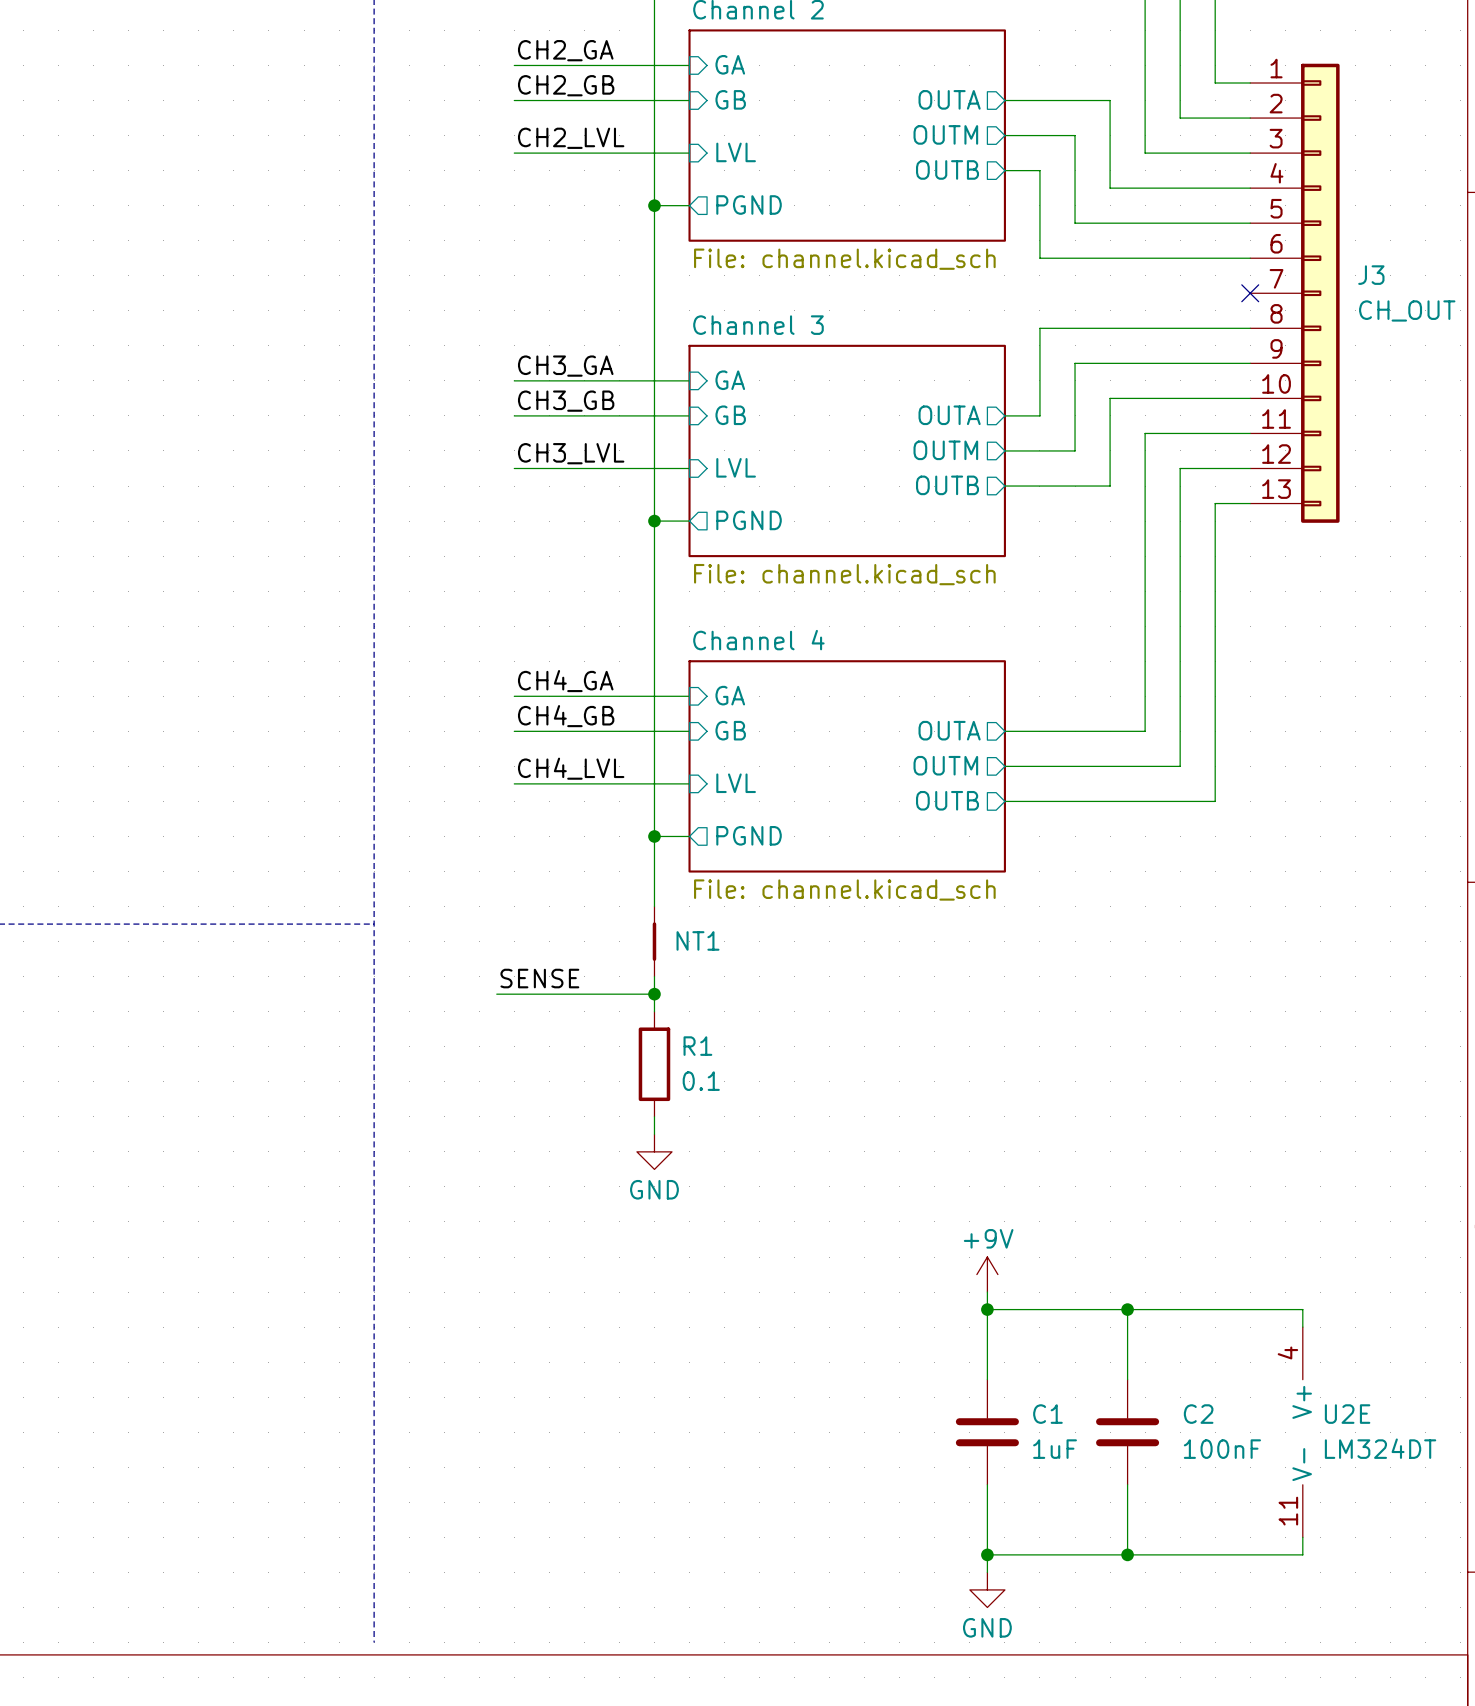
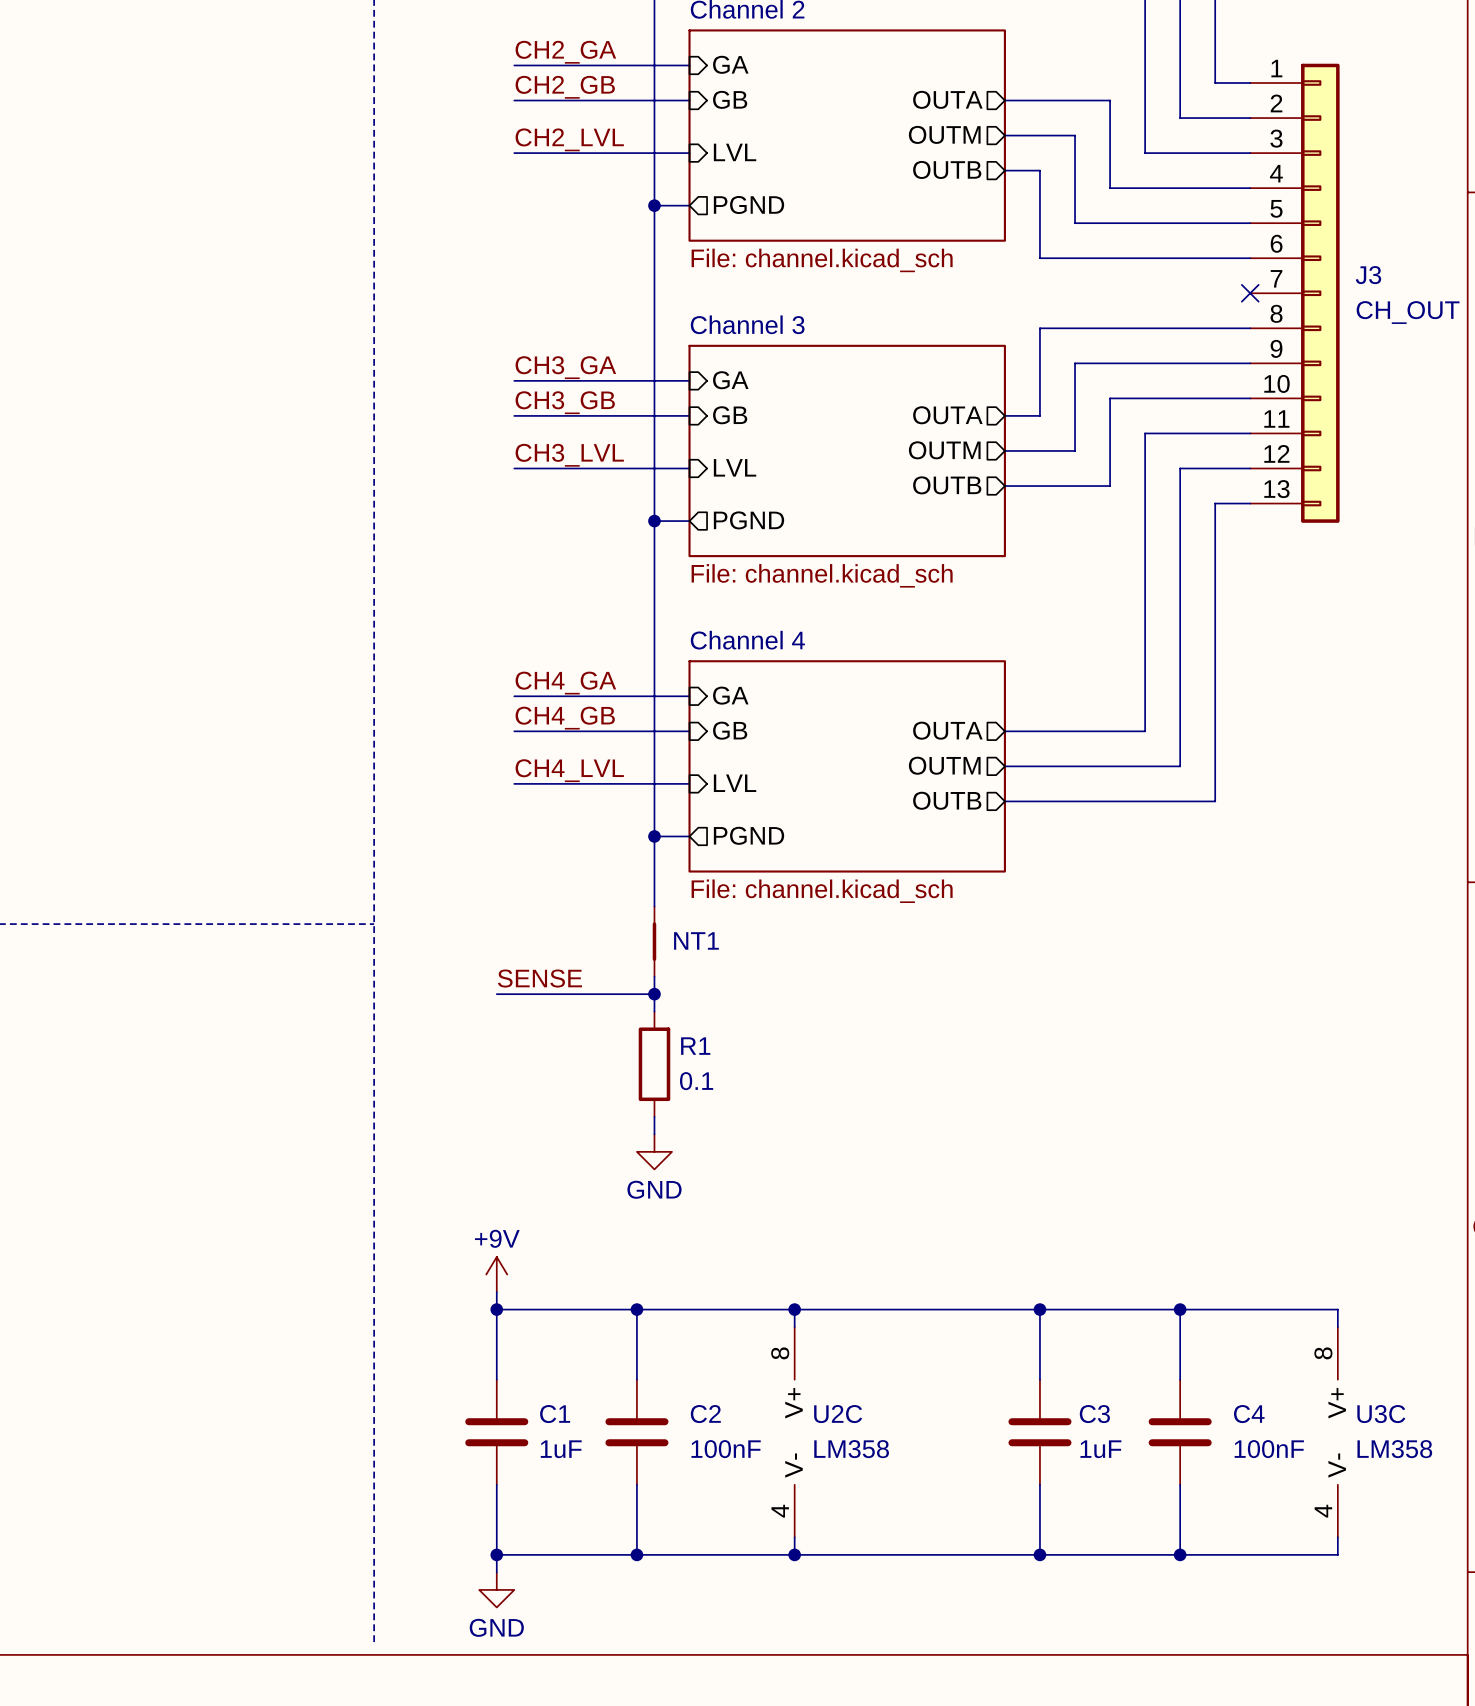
power symbol: none -> +9V (496, 1274)
power symbol: +9V (987, 1274) -> none
wire: none -> (496, 1292) (496, 1379)
wire: (987, 1292) (987, 1379) -> none
wire: none -> (496, 1309) (987, 1309)
junction: none -> (496, 1309)
wire: none -> (636, 1309) (636, 1379)
junction: none -> (636, 1309)
wire: none -> (794, 1309) (794, 1327)
junction: none -> (794, 1309)
junction: (987, 1309) -> none
wire: none -> (1039, 1309) (1039, 1379)
junction: none -> (1039, 1309)
wire: (1127, 1309) (1127, 1379) -> (1180, 1309) (1180, 1379)
junction: (1127, 1309) -> none
junction: none -> (1180, 1309)
wire: (1302, 1309) (1302, 1327) -> (1302, 1309) (1337, 1309) (1337, 1327)
U2C: none -> LM358 (794, 1432)
C1 position: (987, 1432) -> (496, 1432)
C3: none -> 1uF (1039, 1432)
C2 position: (1127, 1432) -> (636, 1432)
C4: none -> 100nF (1180, 1432)
U2E: LM324DT (1302, 1432) -> none
U3C: none -> LM358 (1337, 1432)
wire: none -> (496, 1484) (496, 1572)
wire: none -> (636, 1484) (636, 1554)
wire: (987, 1484) (987, 1572) -> none
wire: none -> (1039, 1484) (1039, 1554)
wire: (1127, 1484) (1127, 1554) -> (1180, 1484) (1180, 1554)
wire: none -> (794, 1537) (794, 1554)
wire: (1302, 1537) (1302, 1554) -> (1337, 1537) (1337, 1554) (1302, 1554)
wire: none -> (496, 1554) (987, 1554)
junction: none -> (496, 1554)
junction: none -> (636, 1554)
junction: none -> (794, 1554)
junction: (987, 1554) -> none
junction: none -> (1039, 1554)
junction: (1127, 1554) -> none
junction: none -> (1180, 1554)
power symbol: none -> GND (496, 1589)
power symbol: GND (987, 1589) -> none

